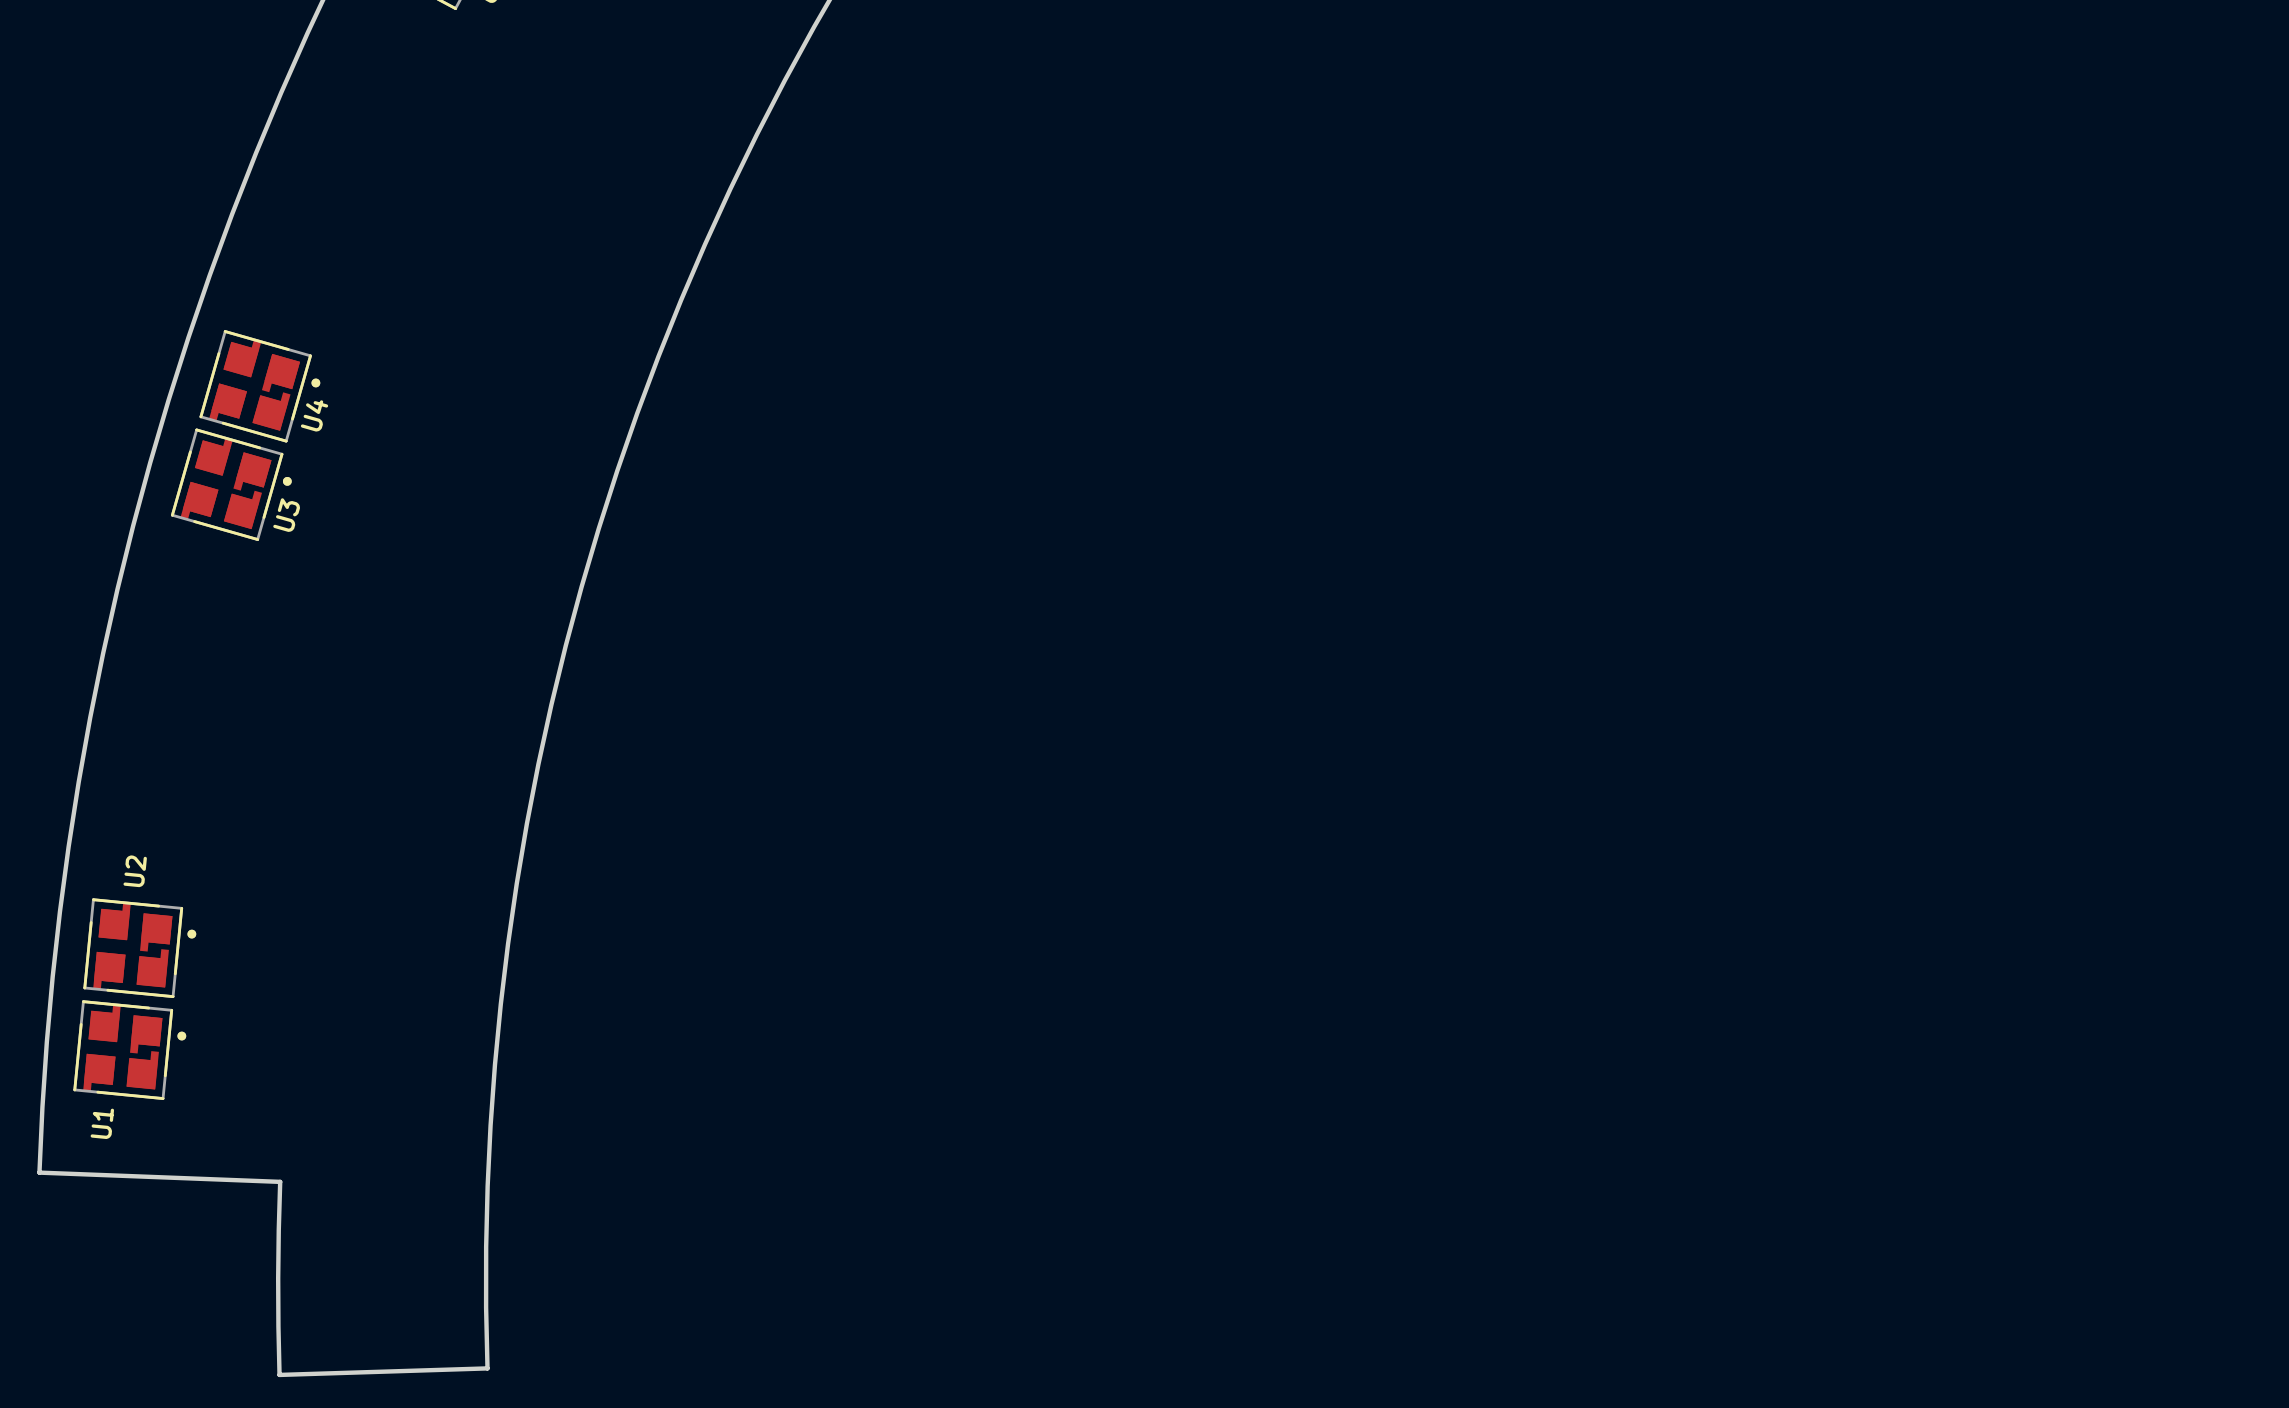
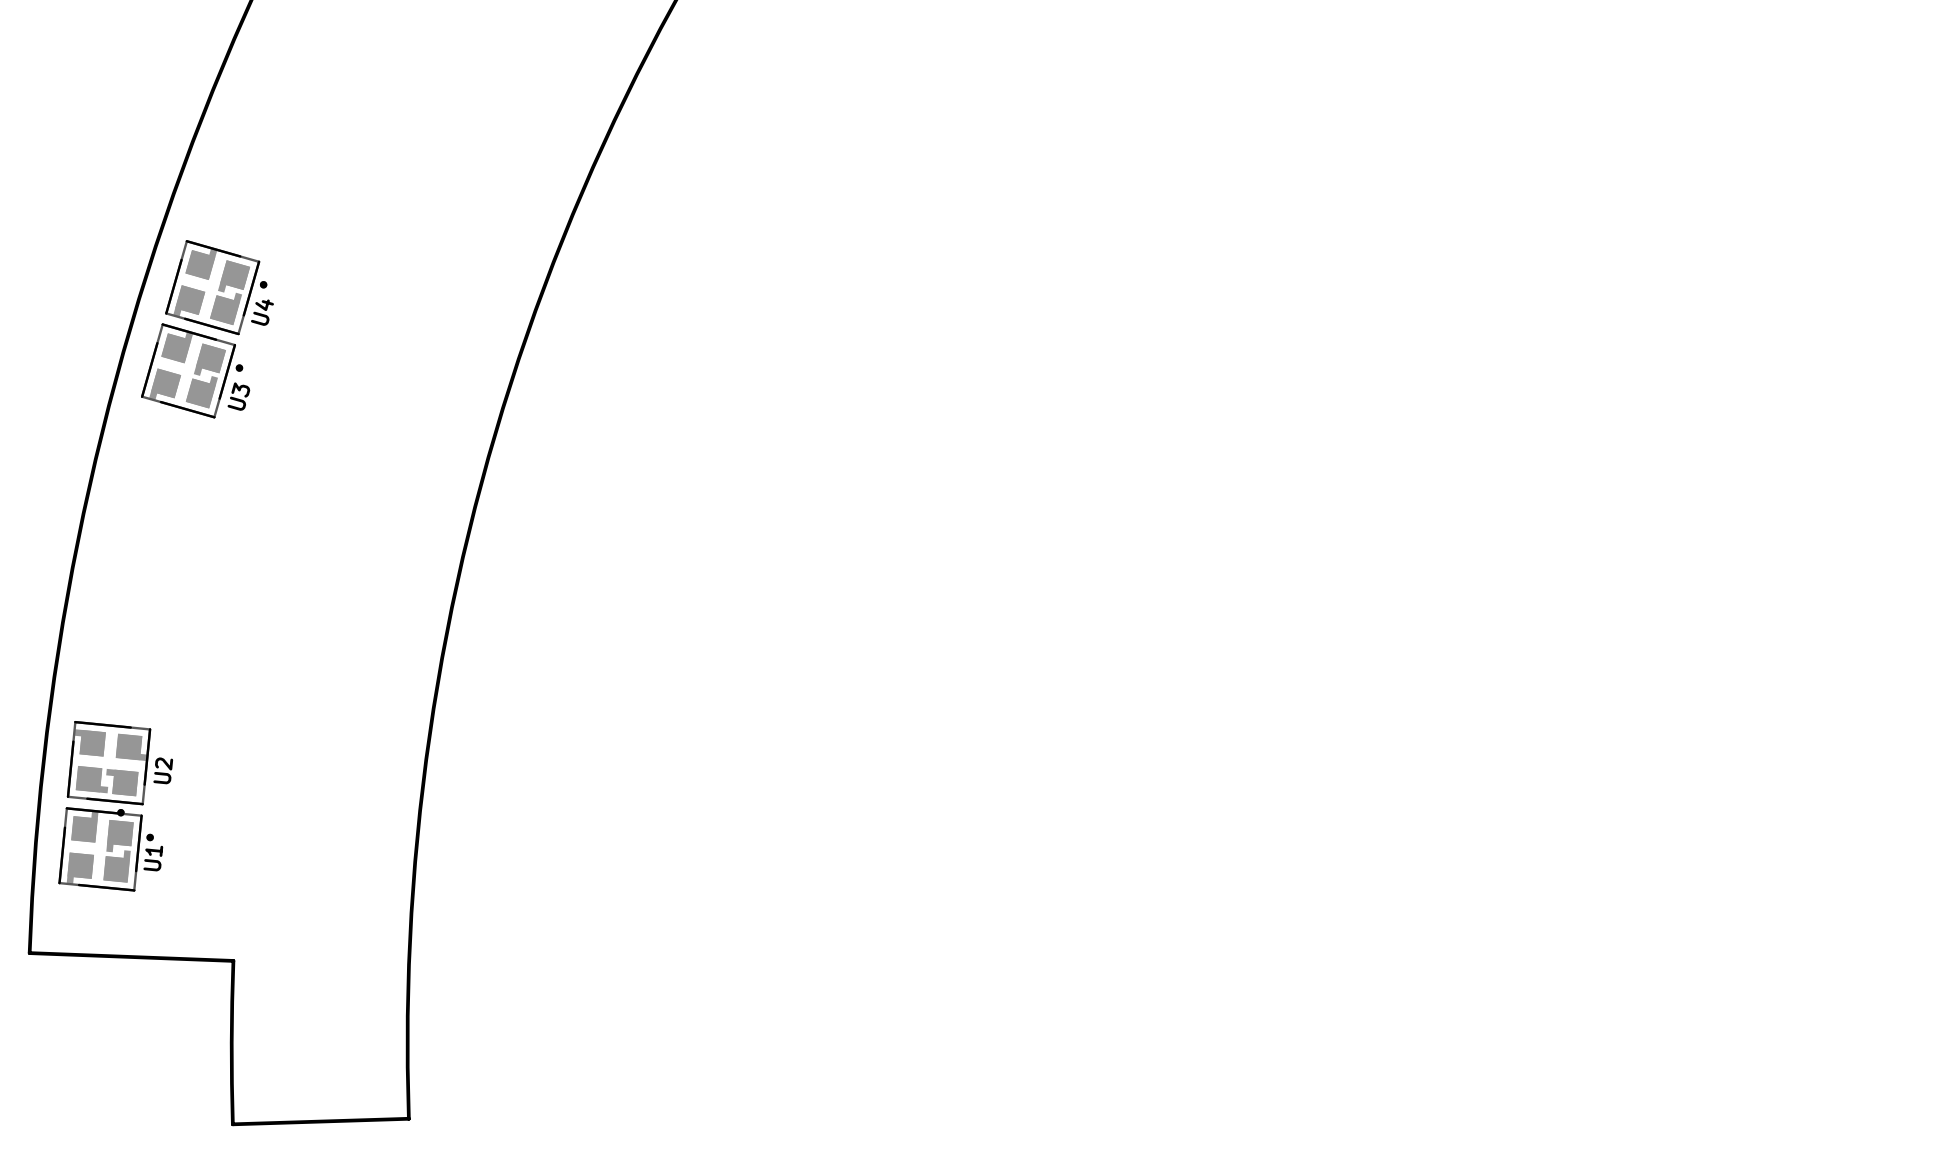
U2 rotation: 0° (139, 948) -> 90° clockwise (109, 768)
U1 name position: U1 (102, 1123) -> U1 (153, 858)

